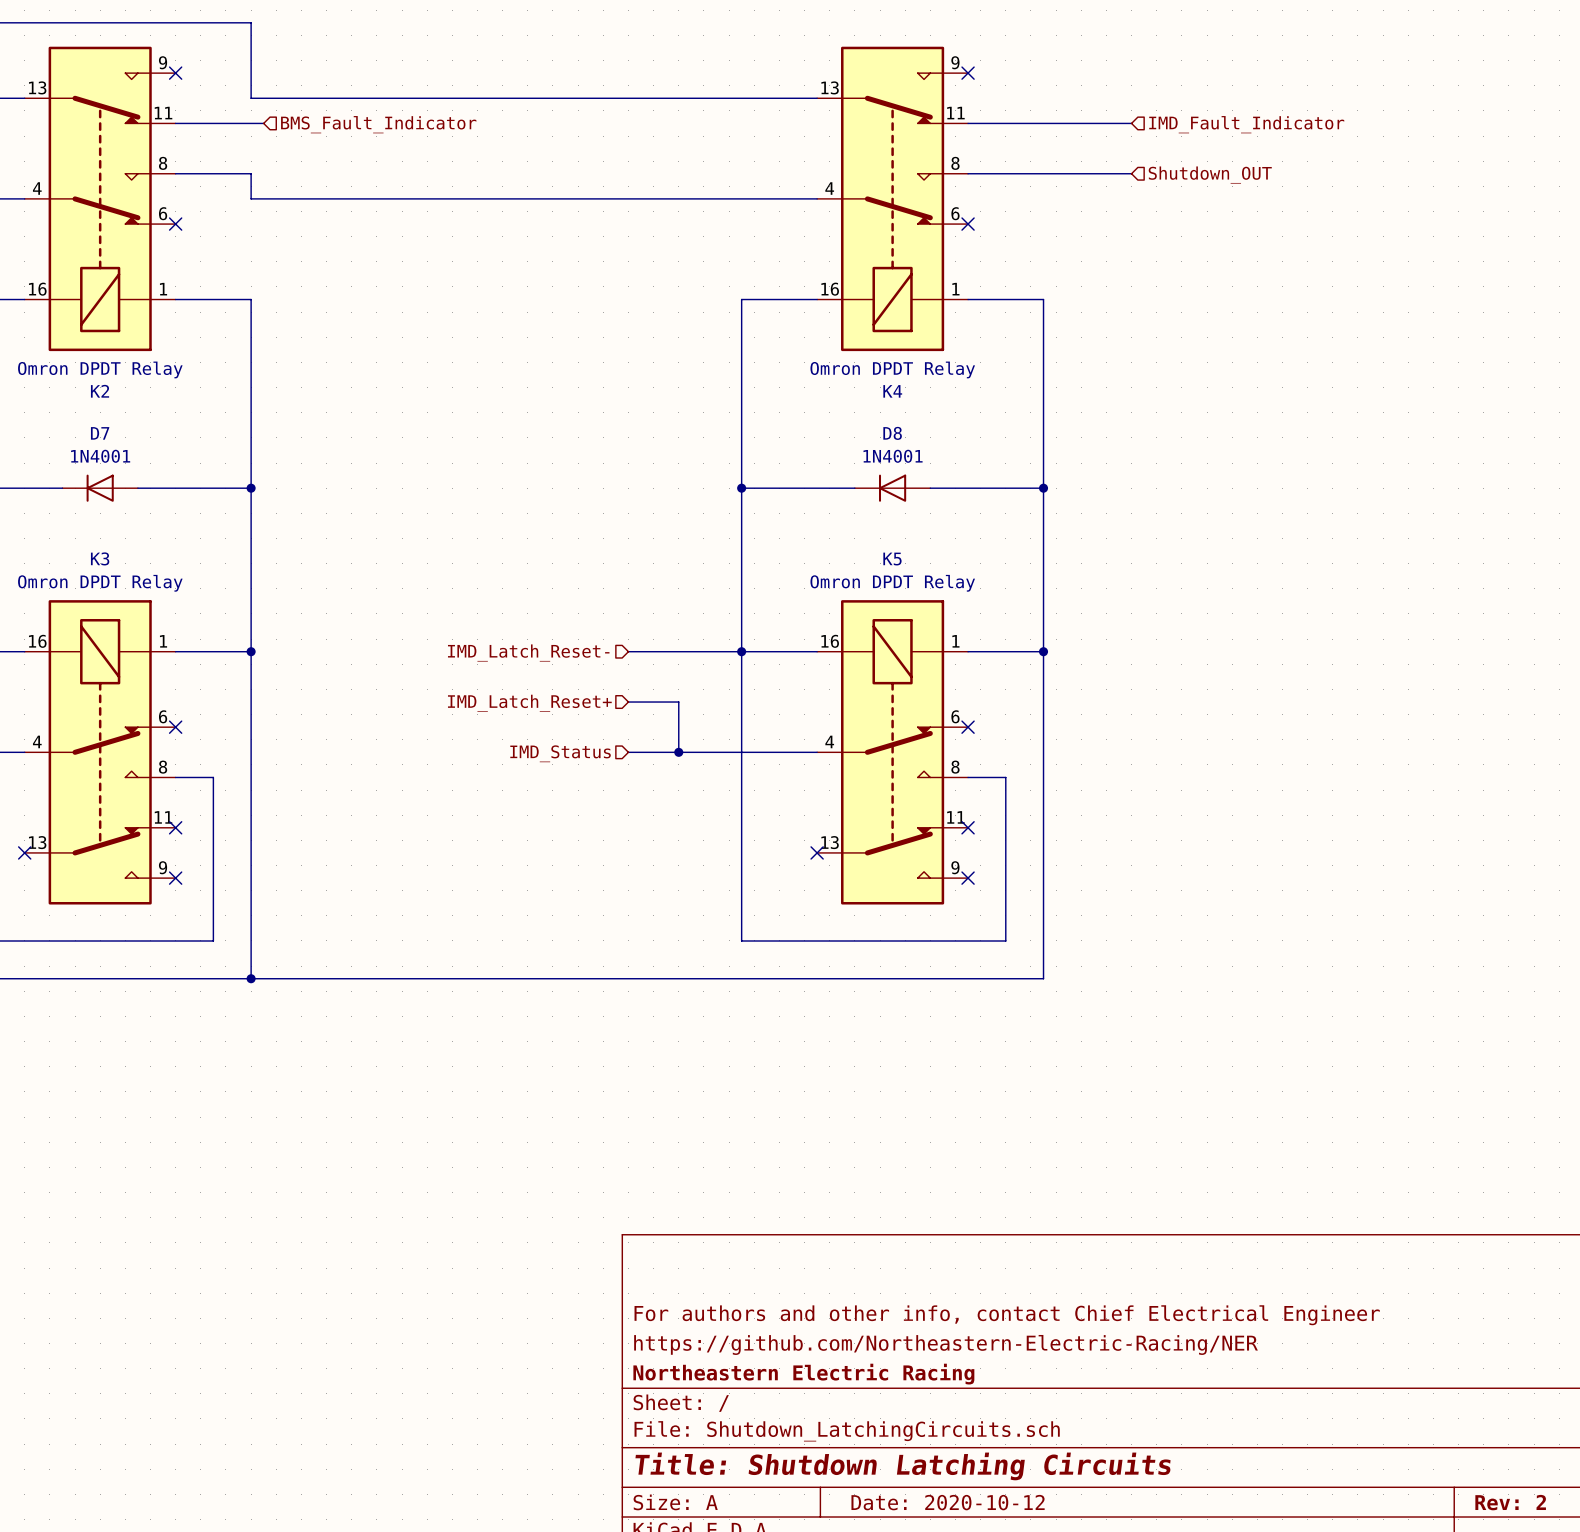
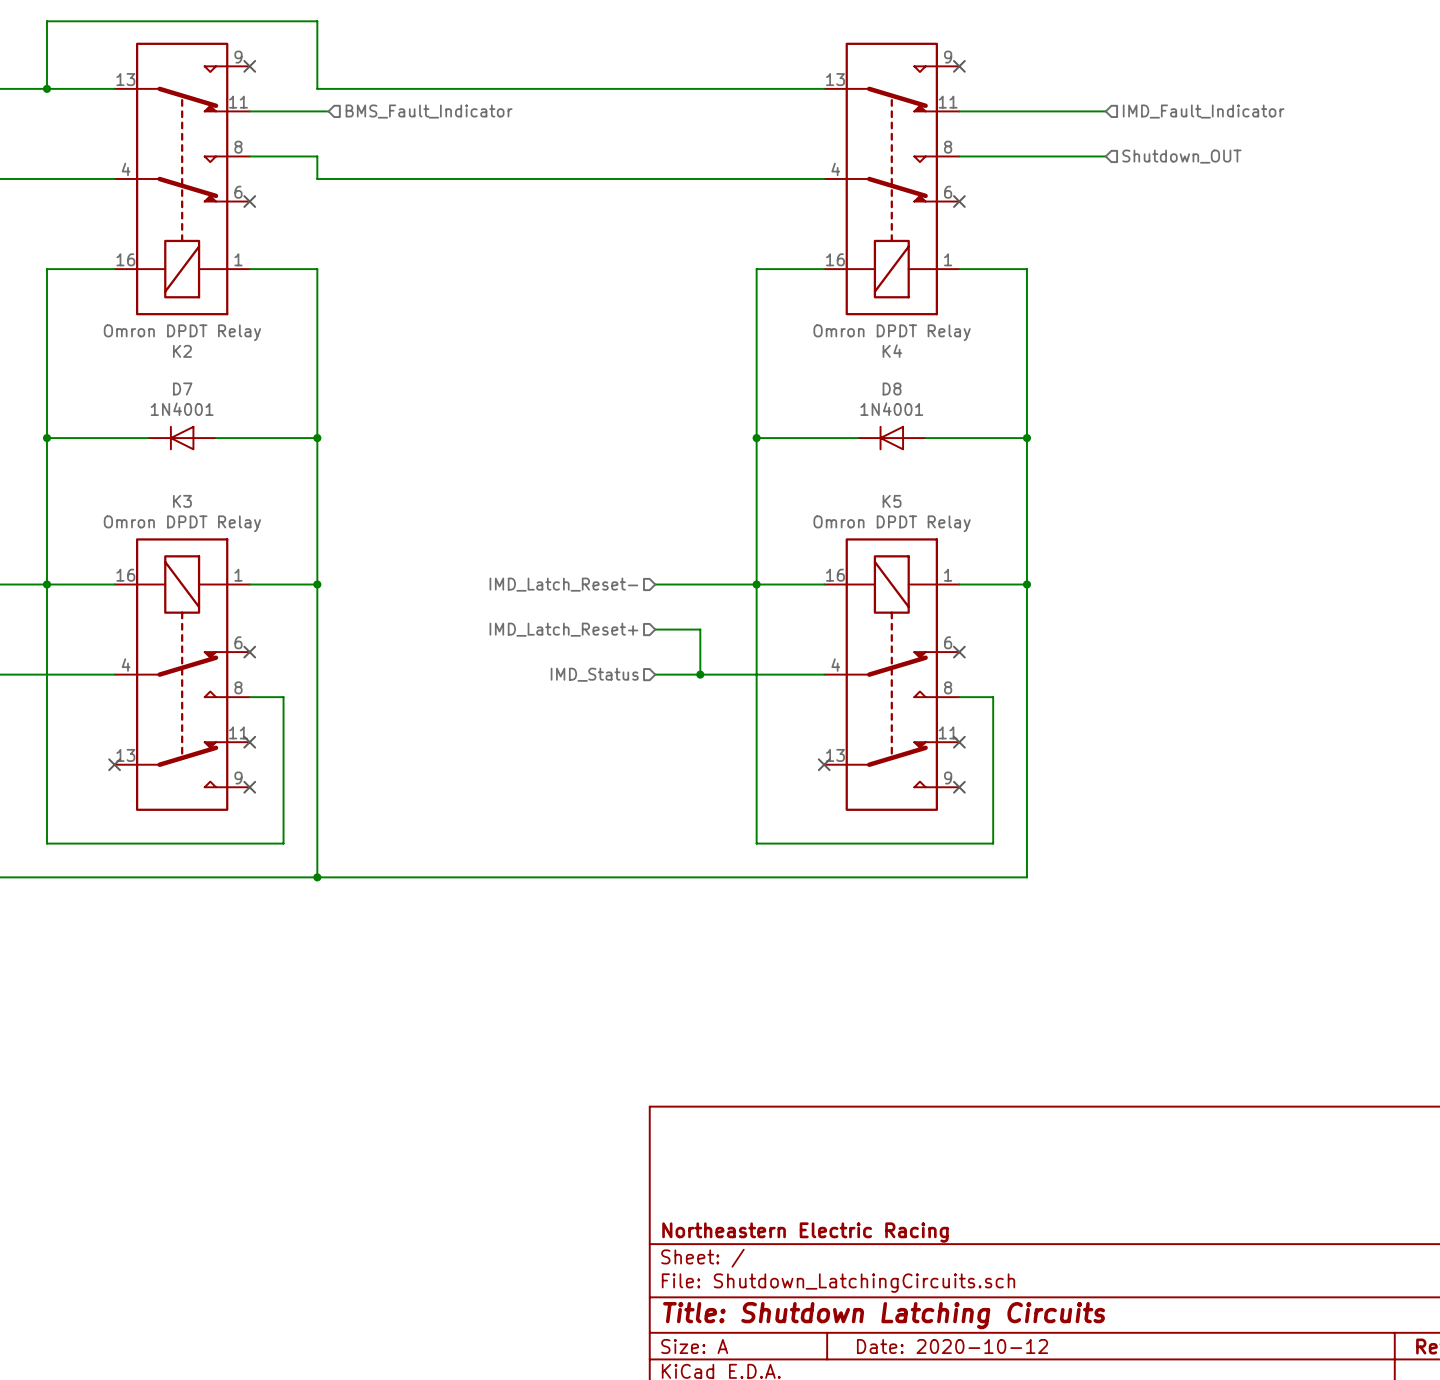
title block: For authors and other info, contact Chief Electrical Engineer (1007, 1315) -> none
title block: https://github.com/Northeastern-Electric-Racing/NER (946, 1344) -> none

